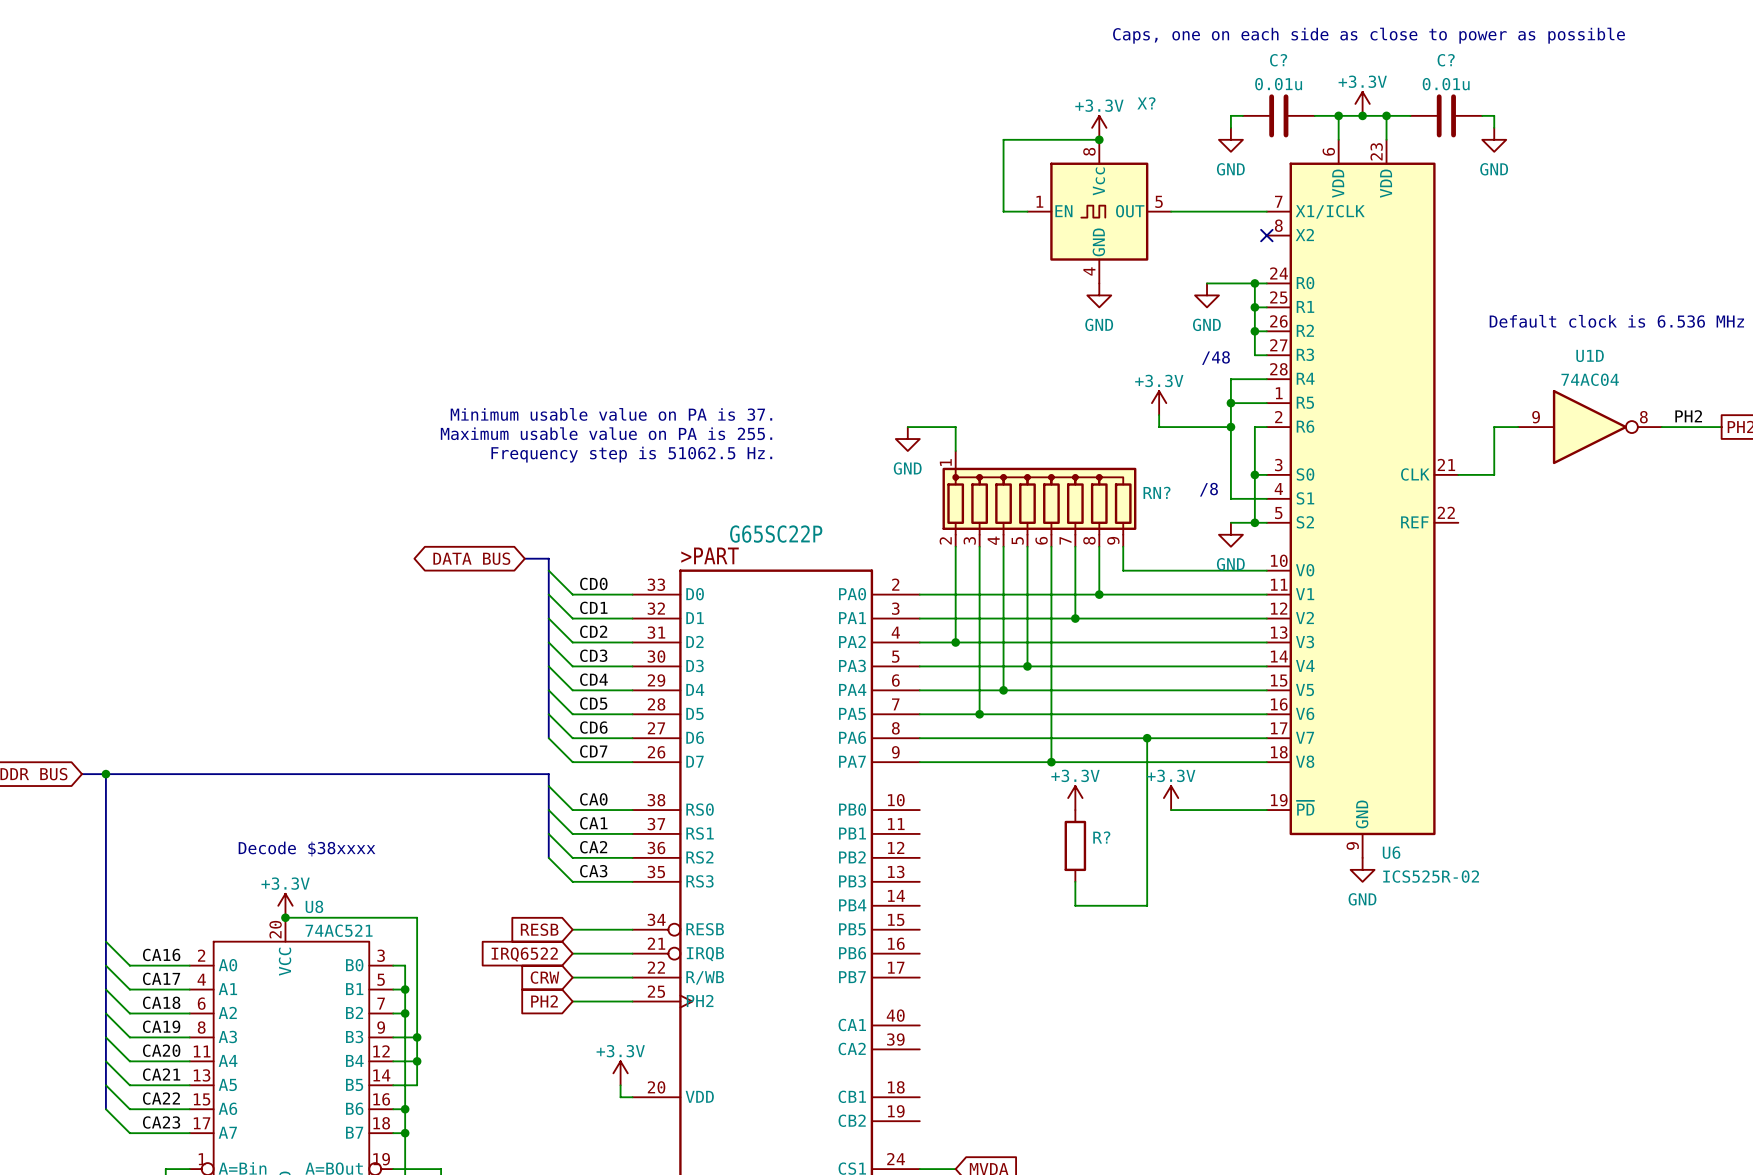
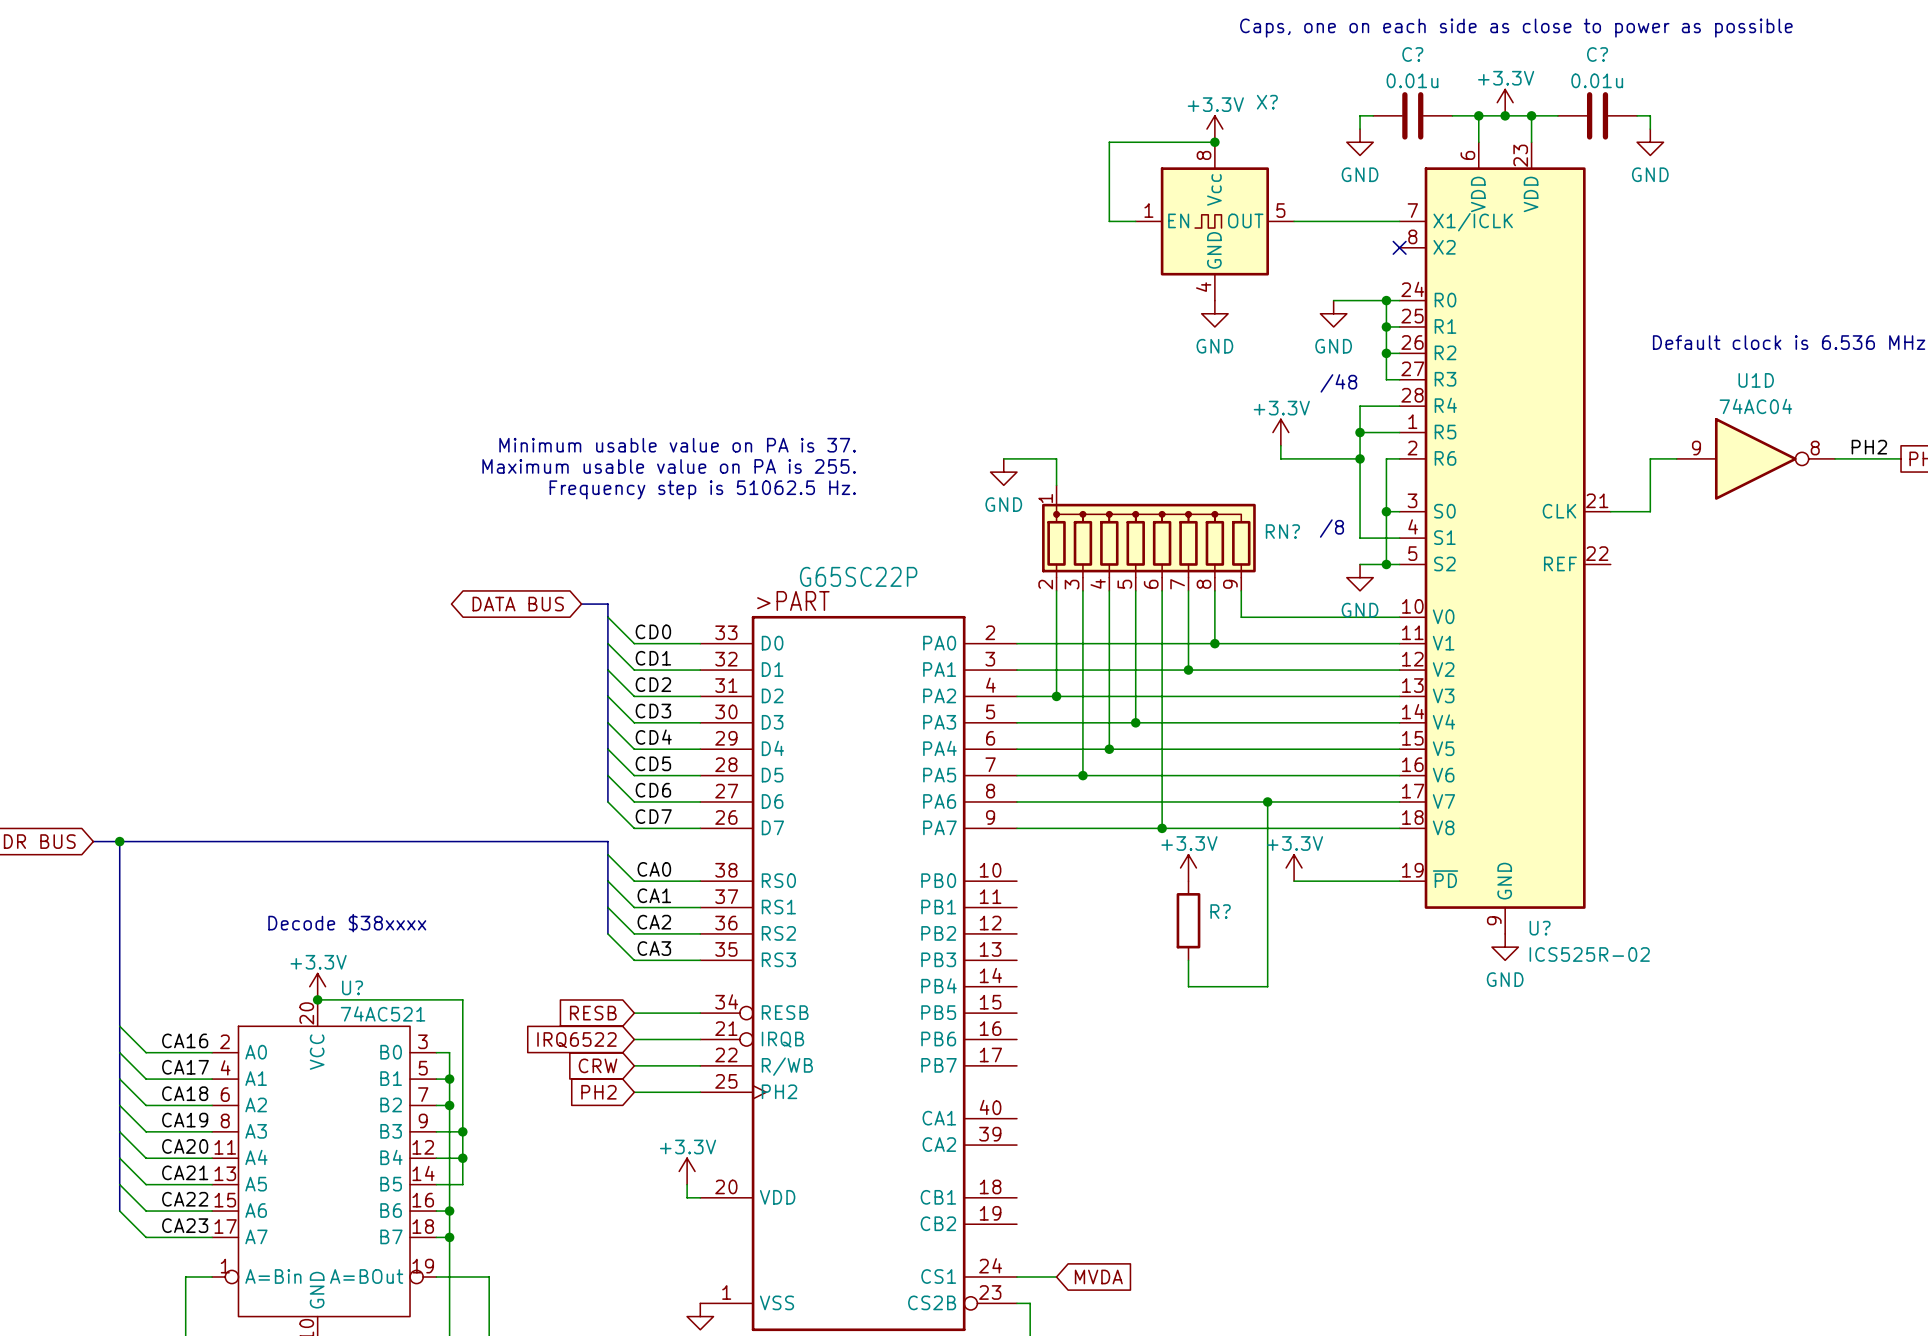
U6 name: U6 (1391, 852) -> U? (1540, 928)
U8 name: U8 (314, 906) -> U? (352, 987)

